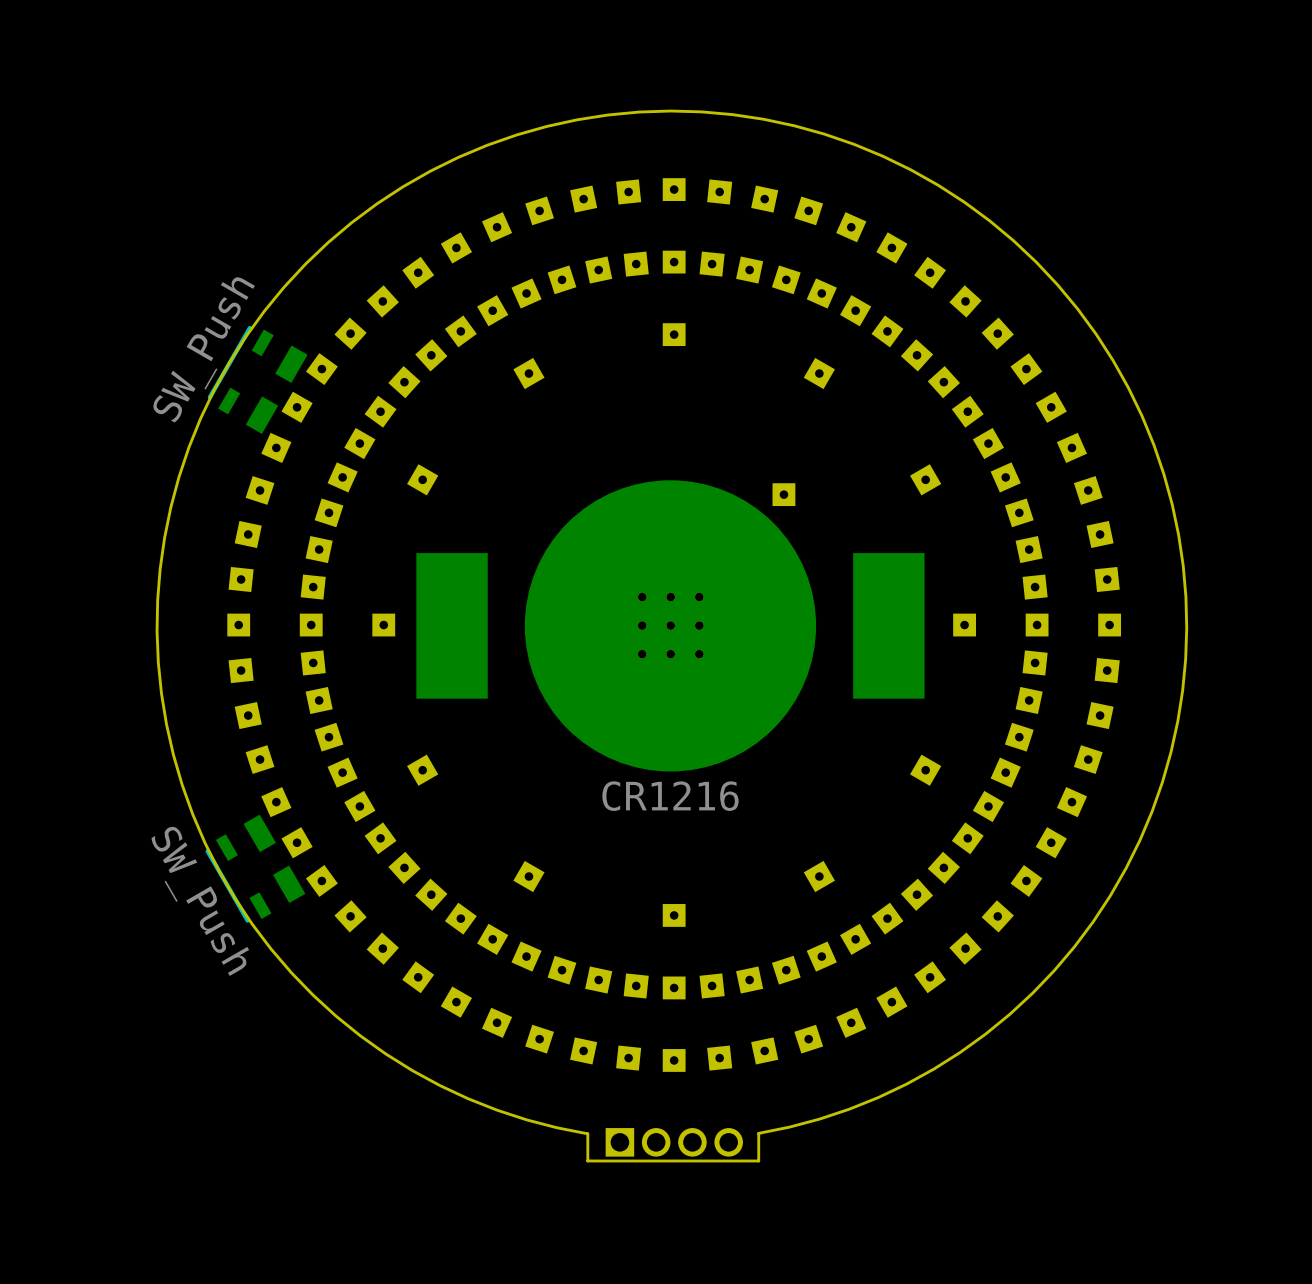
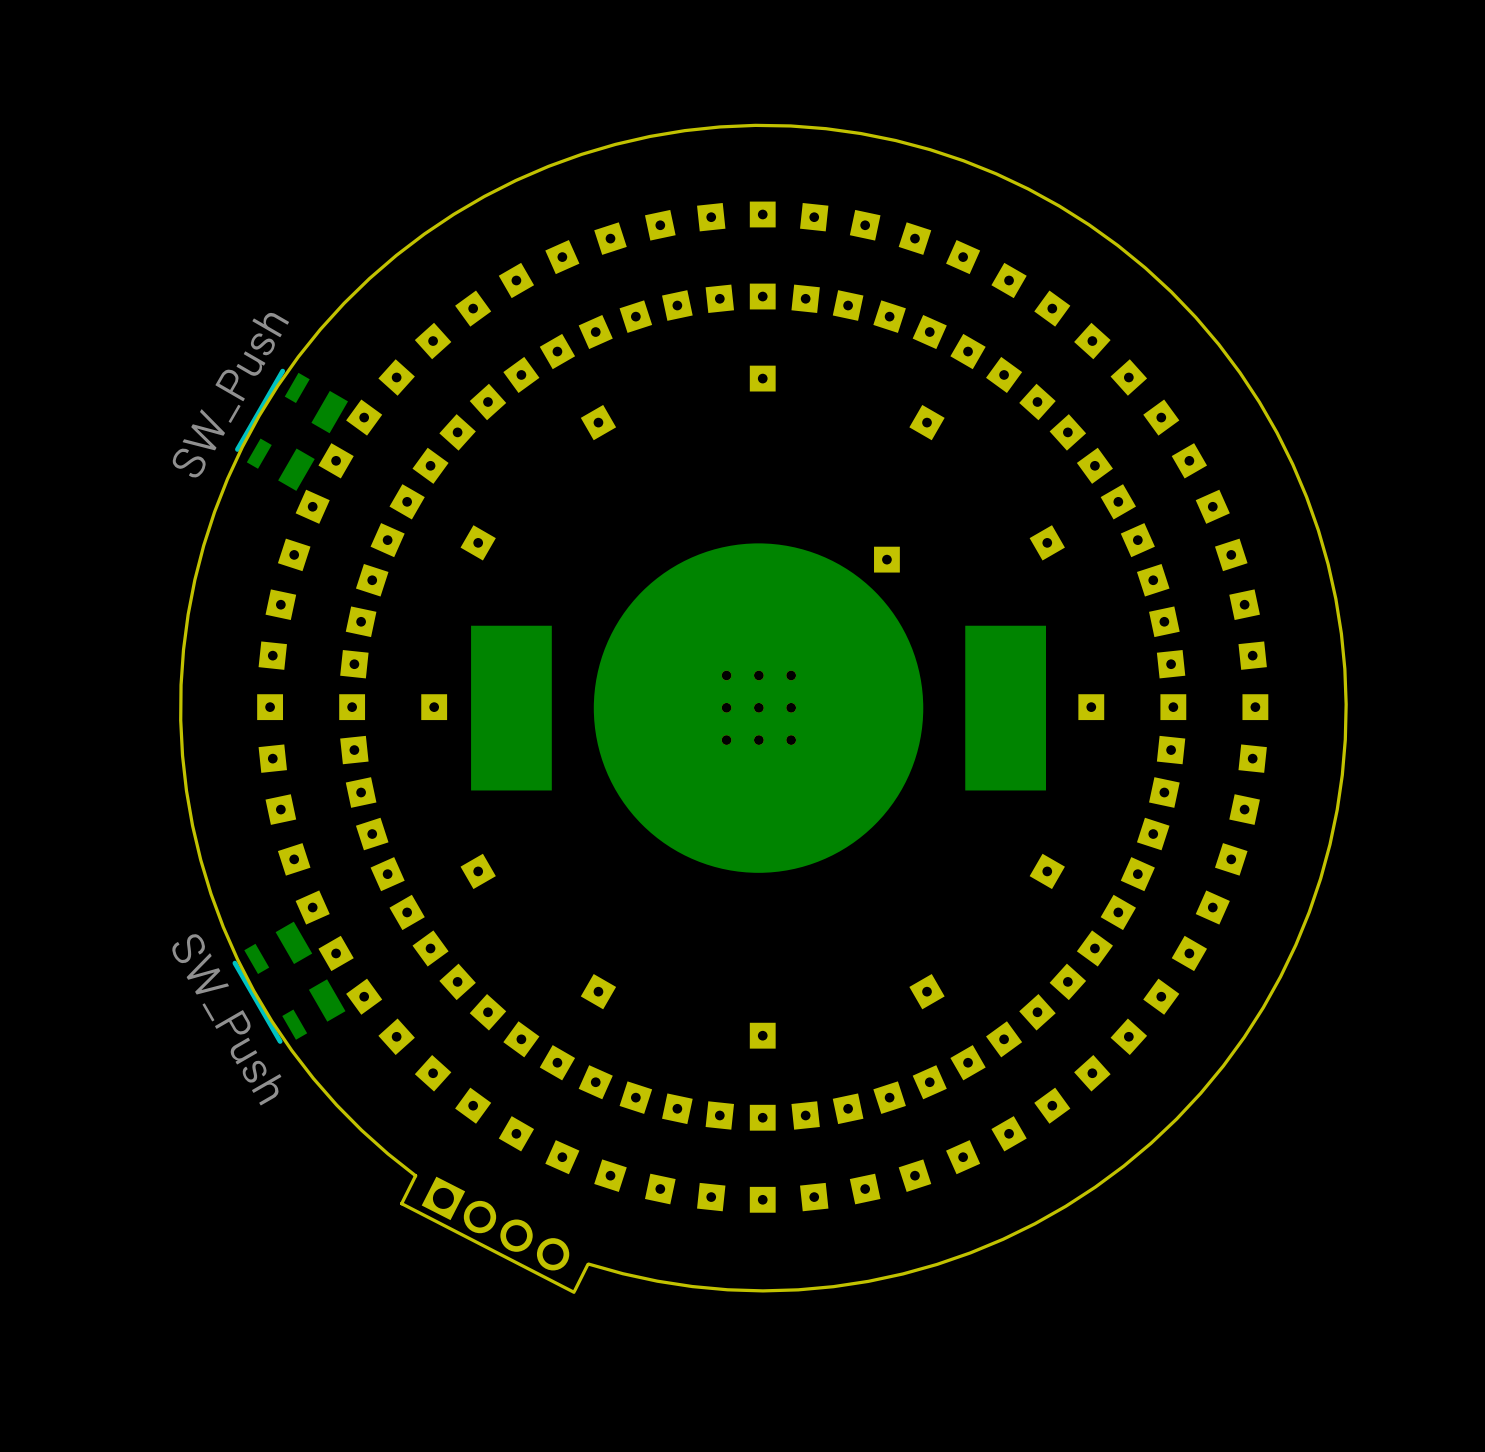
part value: CR1216 (670, 796) -> none
part: none -> (495, 1223)
board edge: none -> (587, 1264) (574, 1290)
board edge: none -> (588, 1264) (622, 1273) (692, 1286) (762, 1290) (833, 1286) (868, 1281) (937, 1264) (1003, 1239) (1034, 1223) (1065, 1206) (1123, 1166) (1176, 1119) (1223, 1065) (1263, 1007) (1280, 976) (1295, 944) (1320, 878) (1337, 809) (1342, 774) (1345, 739) (1344, 669) (1335, 598) (1318, 530) (1292, 464) (1277, 432) (1239, 372) (1218, 344) (1171, 291) (1117, 245) (1059, 206) (1028, 189) (963, 160) (929, 149) (895, 140) (826, 128) (755, 125) (684, 130) (615, 144) (581, 154) (548, 166) (484, 196) (424, 234) (396, 255) (344, 303) (320, 329) (277, 385) (242, 446) (214, 512) (203, 545) (188, 614) (183, 649) (180, 720) (182, 755) (192, 825) (200, 860) (223, 927) (237, 959) (271, 1021) (313, 1078) (361, 1130) (415, 1175) (401, 1203) (573, 1292)
board edge: (758, 1133) (758, 1160) (587, 1160) (587, 1133) (526, 1119) (468, 1098) (439, 1085) (385, 1053) (360, 1035) (313, 995) (270, 948) (252, 924) (219, 870) (192, 814) (182, 784) (166, 724) (161, 693) (157, 631) (160, 568) (170, 507) (188, 447) (200, 418) (214, 390) (245, 336) (264, 311) (305, 264) (328, 242) (377, 203) (430, 171) (458, 157) (516, 134) (577, 119) (608, 114) (670, 111) (701, 111) (763, 119) (824, 134) (853, 144) (910, 169) (964, 202) (1013, 240) (1036, 262) (1077, 309) (1113, 360) (1128, 387) (1153, 444) (1163, 474) (1178, 535) (1183, 566) (1186, 628) (1185, 659) (1177, 721) (1162, 782) (1152, 811) (1126, 868) (1093, 921) (1054, 970) (1032, 993) (985, 1034) (960, 1052) (906, 1084) (849, 1109) (789, 1127) (758, 1133) -> none
part: (674, 1142) -> none

